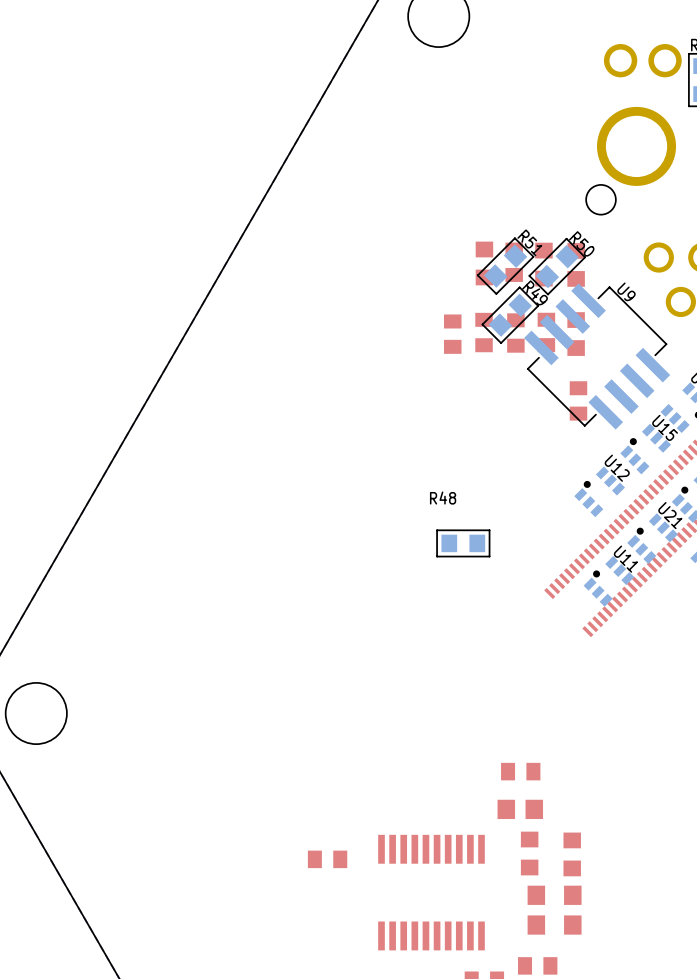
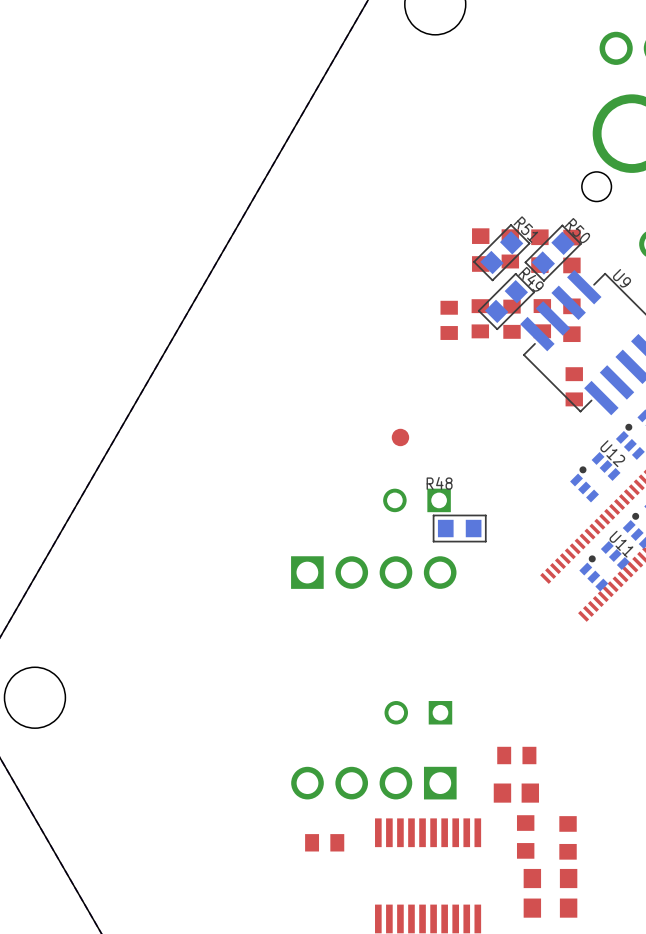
part: none -> (400, 437)
part: none -> (416, 500)
part: none -> (373, 572)
part: none -> (418, 712)
part: none -> (373, 783)

